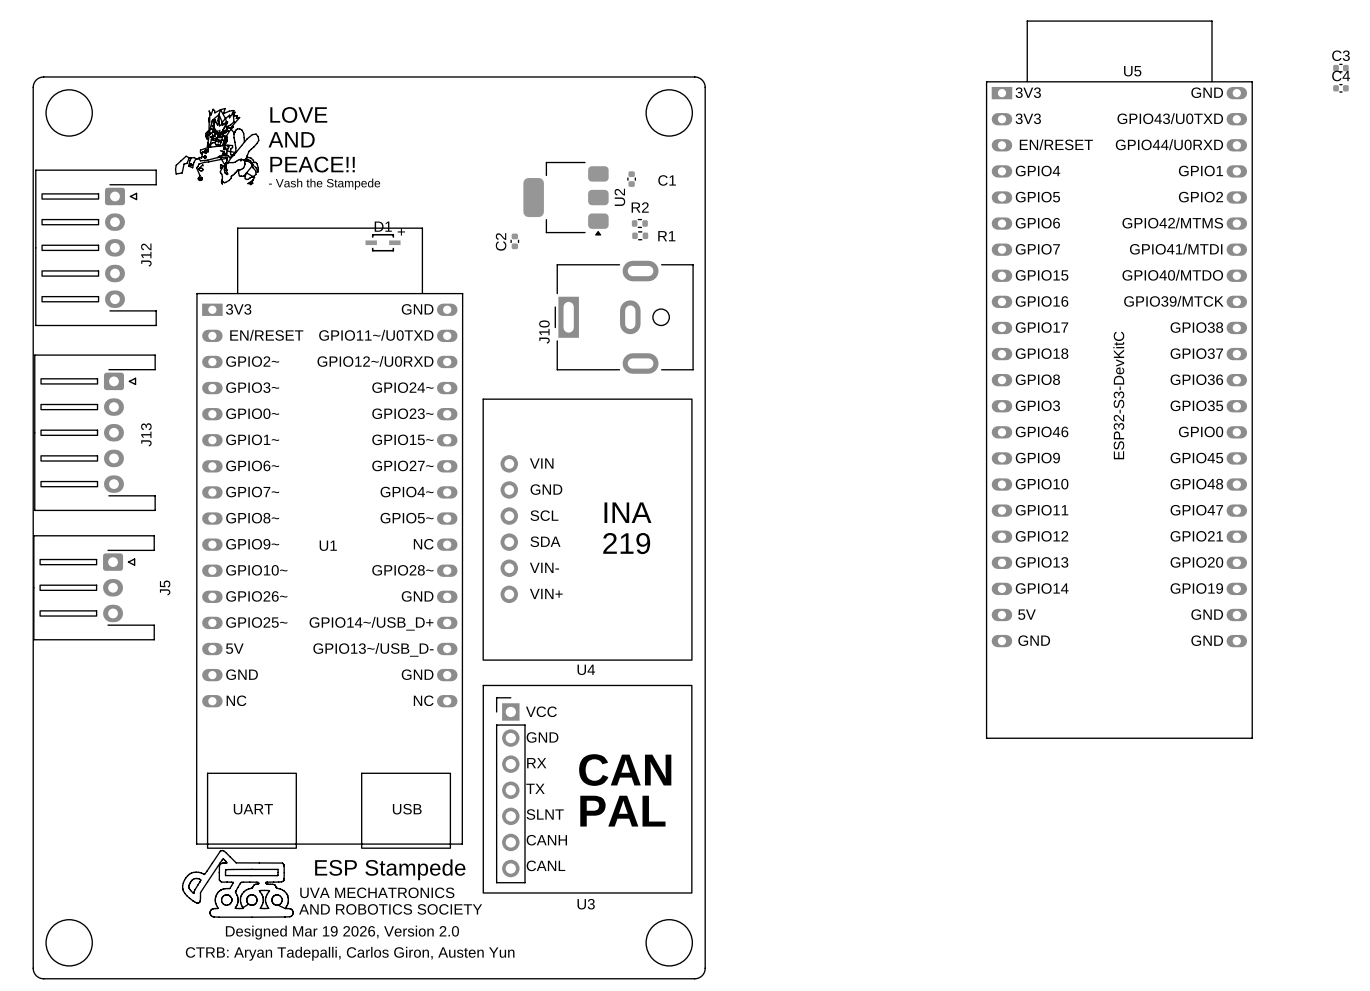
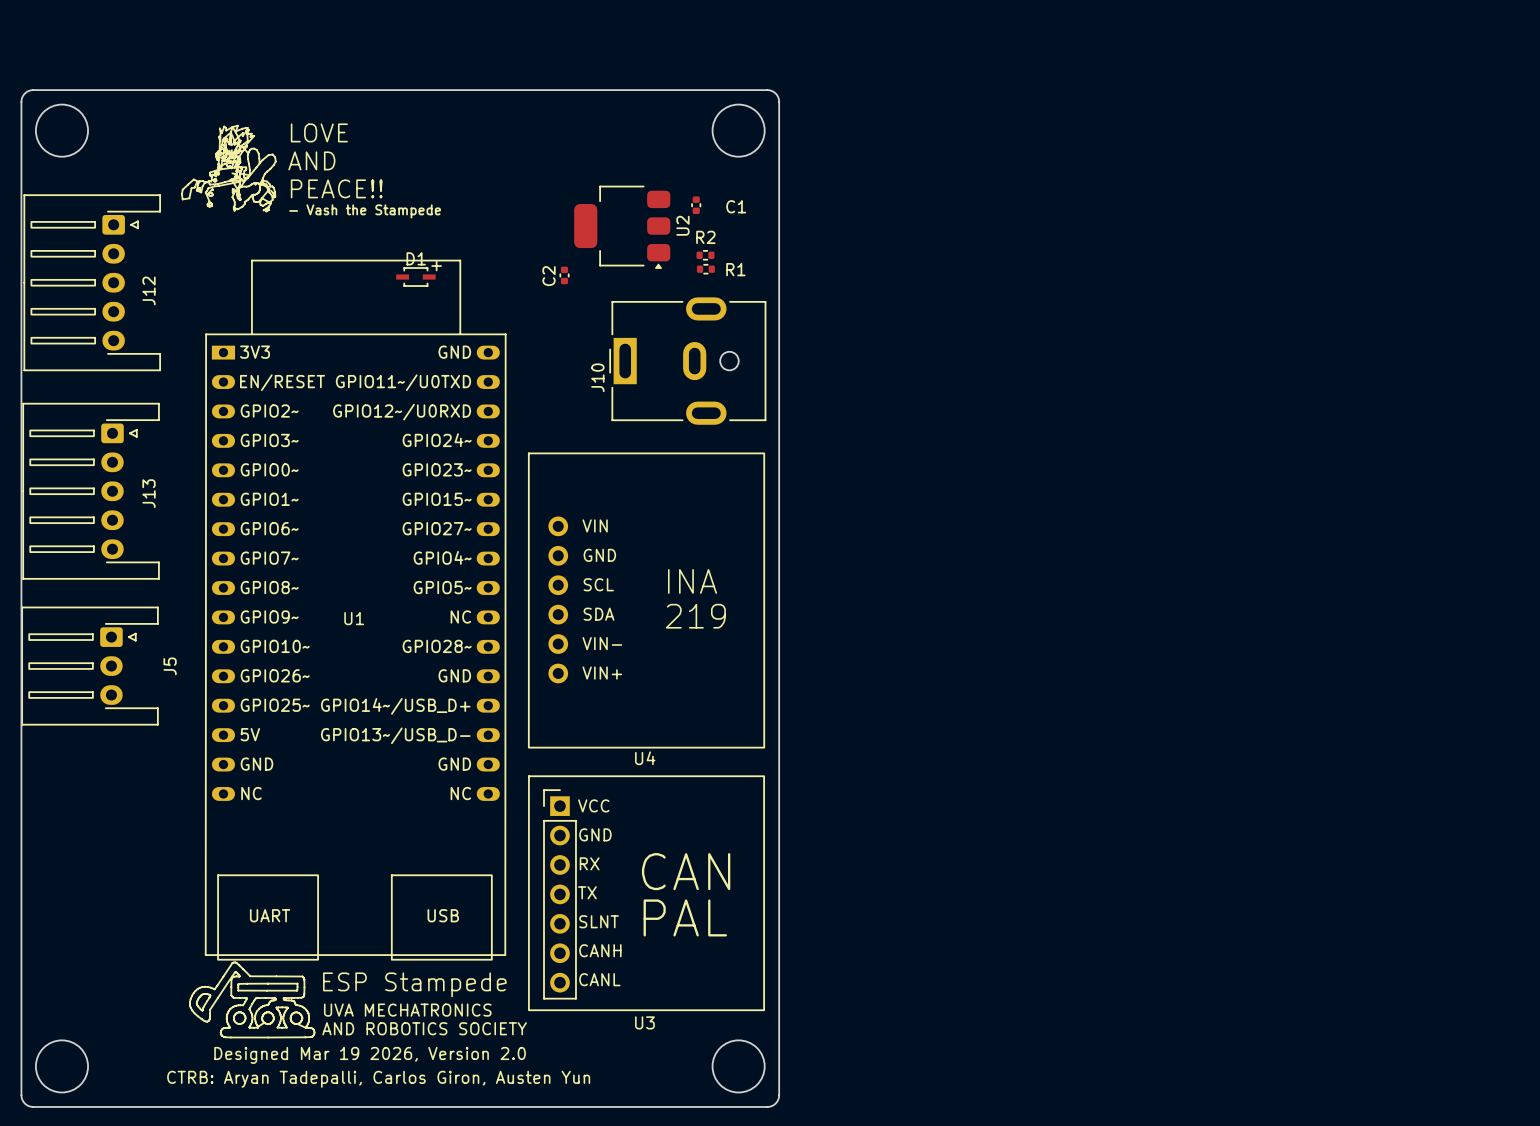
C3: (1340, 68) -> none
C4: (1340, 88) -> none
U5: ESP32-S3-DevKitC (1119, 379) -> none

